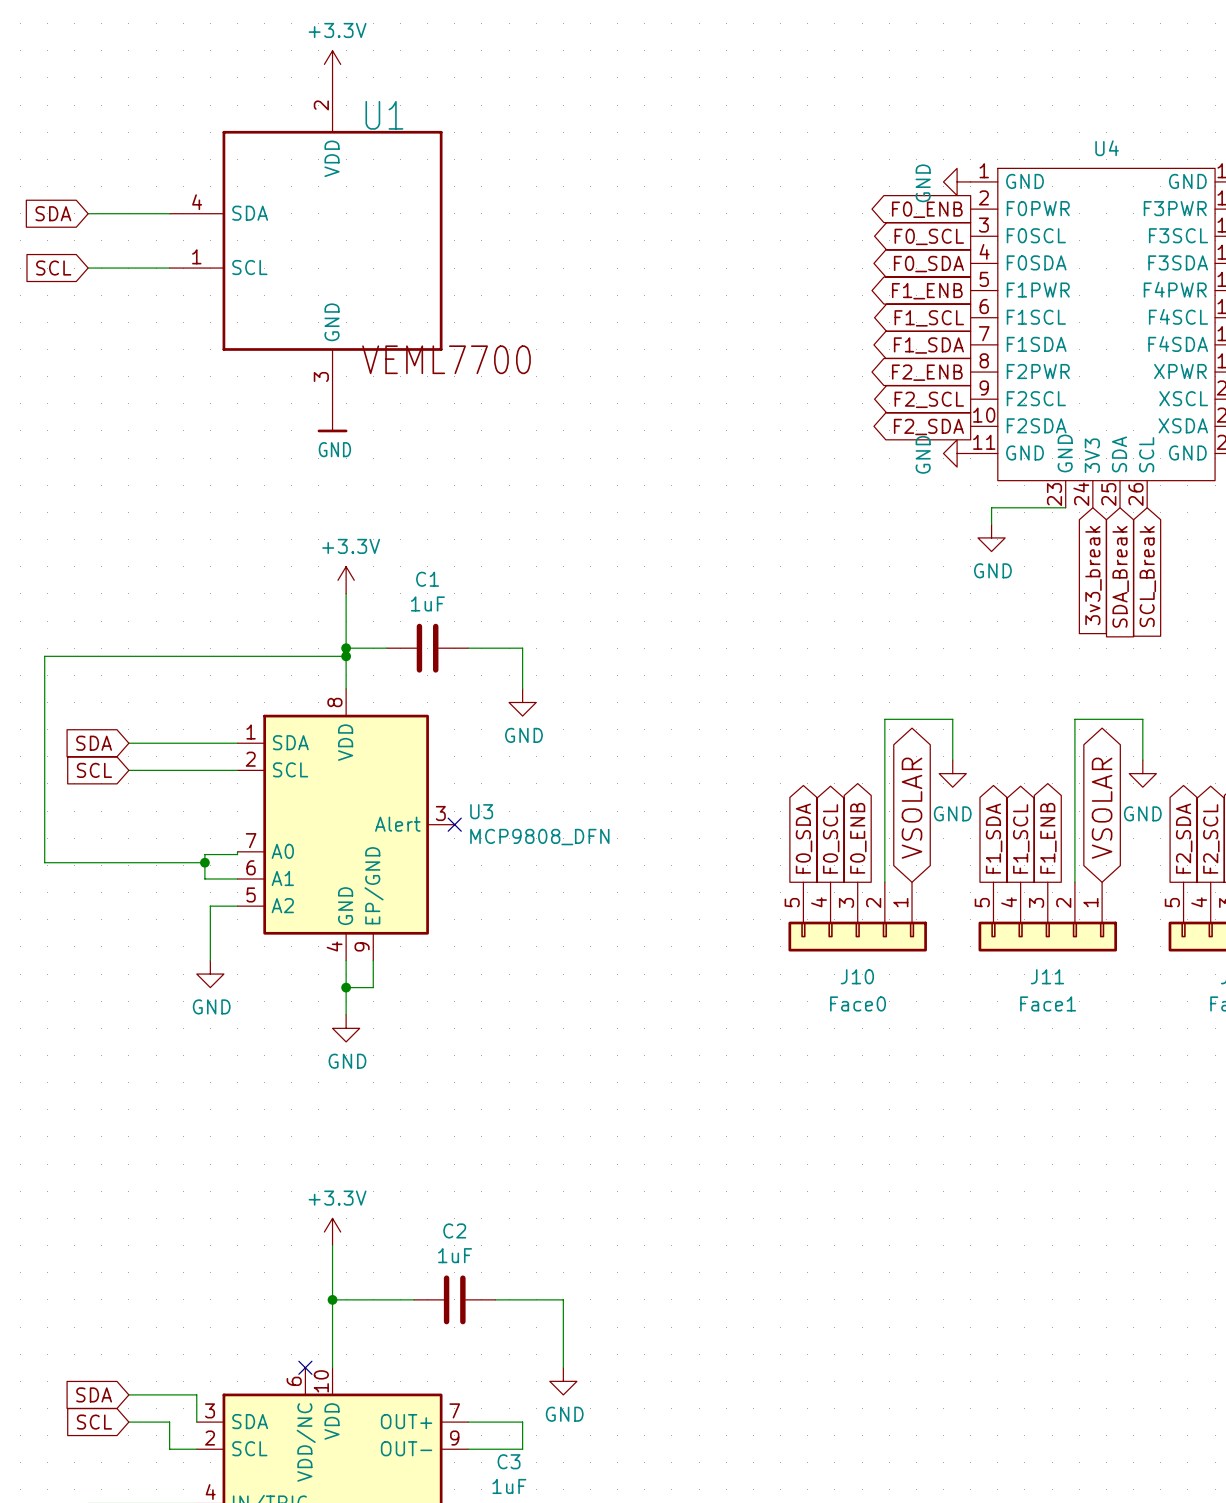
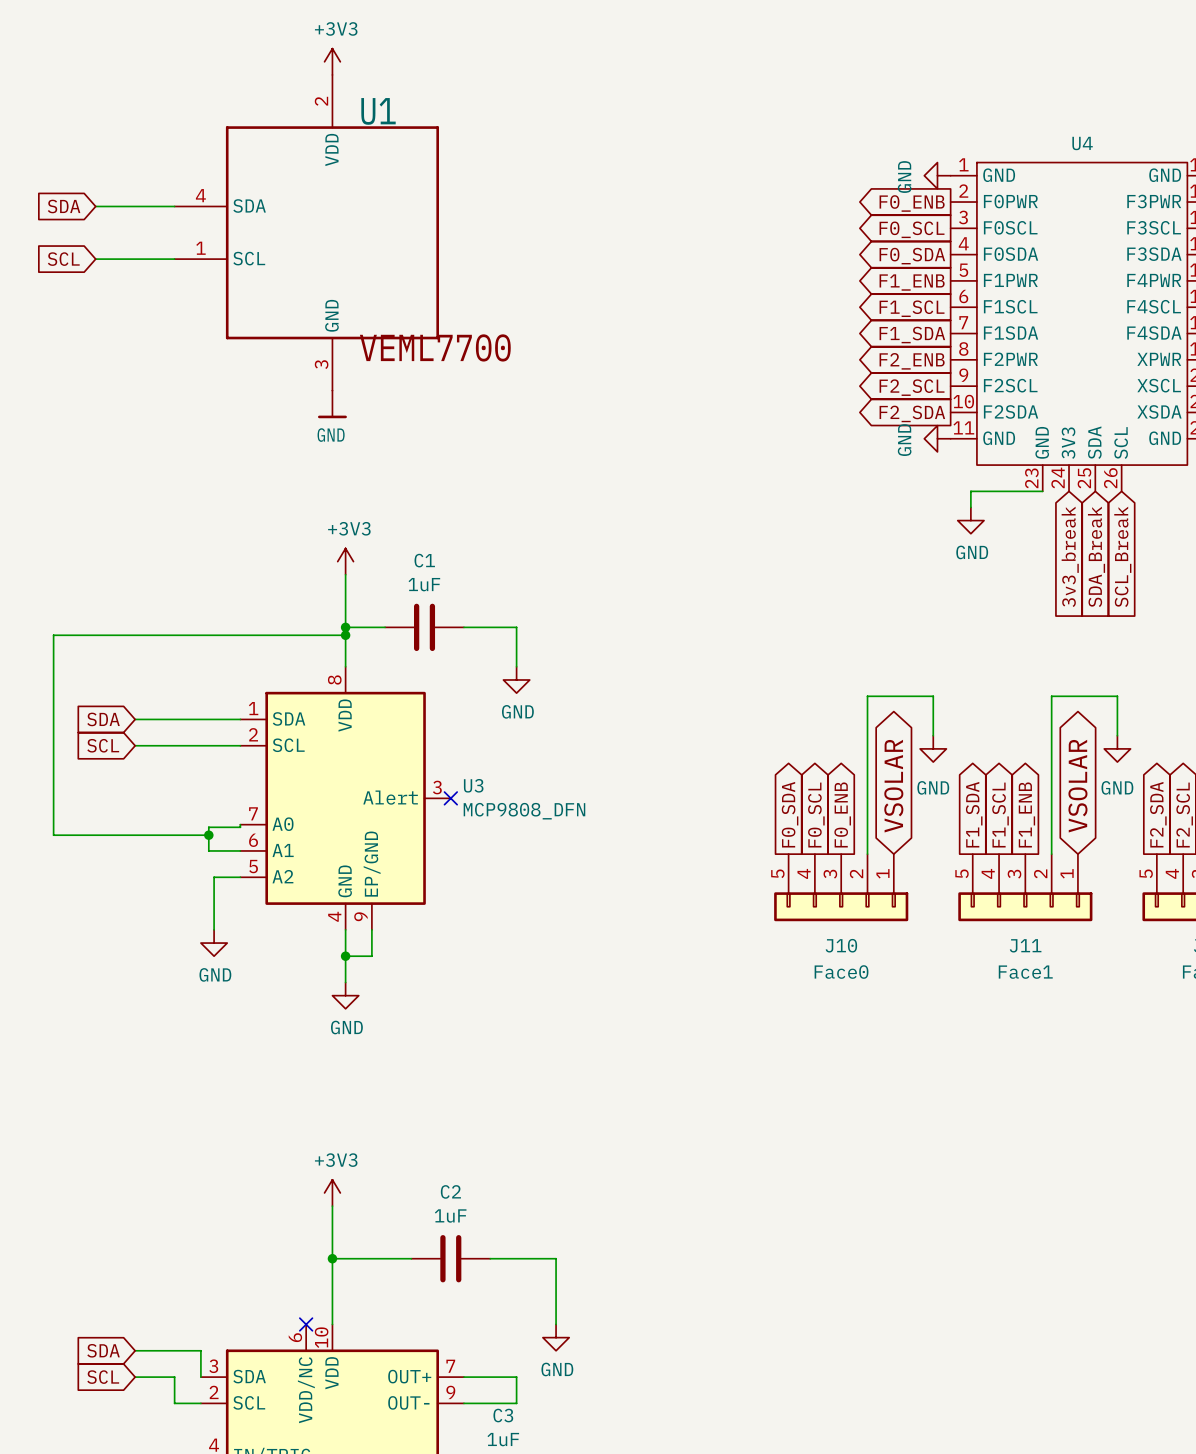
power symbol: +3.3V (332, 64) -> +3V3 (332, 61)
power symbol: +3.3V (346, 580) -> +3V3 (345, 561)
power symbol: +3.3V (332, 1232) -> +3V3 (332, 1192)

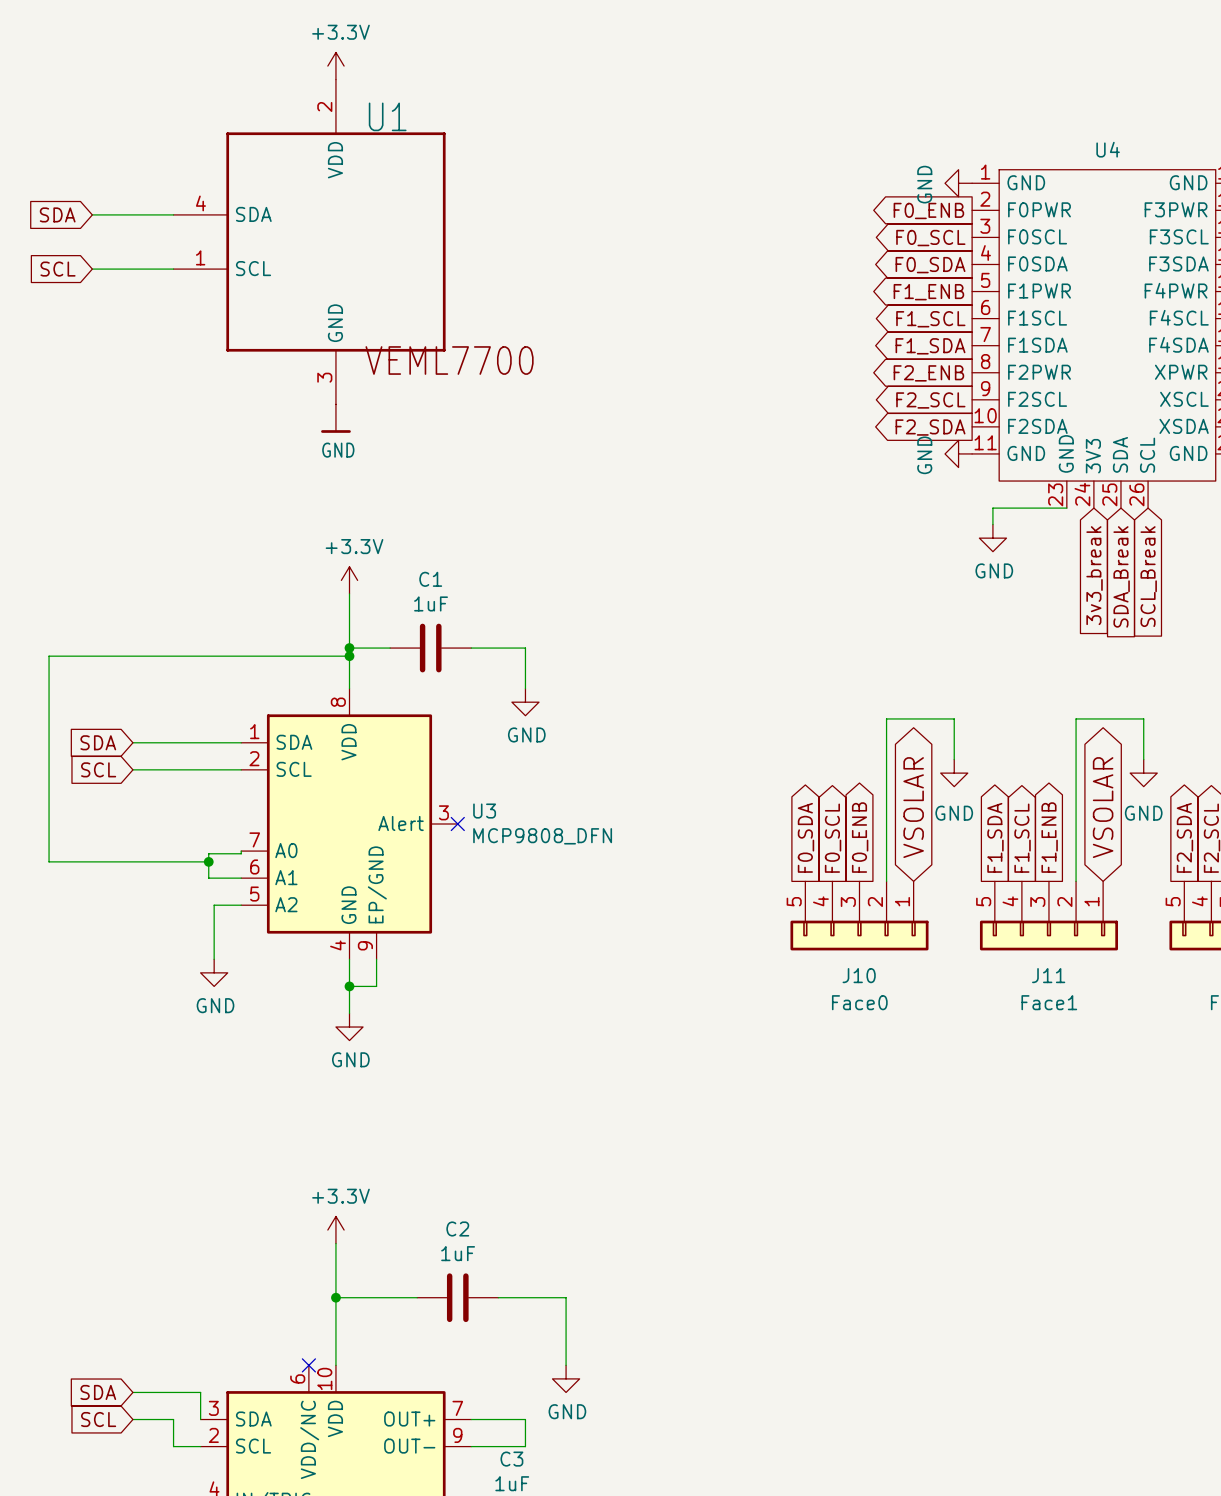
power symbol: +3V3 (332, 61) -> +3.3V (335, 66)
power symbol: +3V3 (345, 561) -> +3.3V (349, 580)
power symbol: +3V3 (332, 1192) -> +3.3V (335, 1230)

